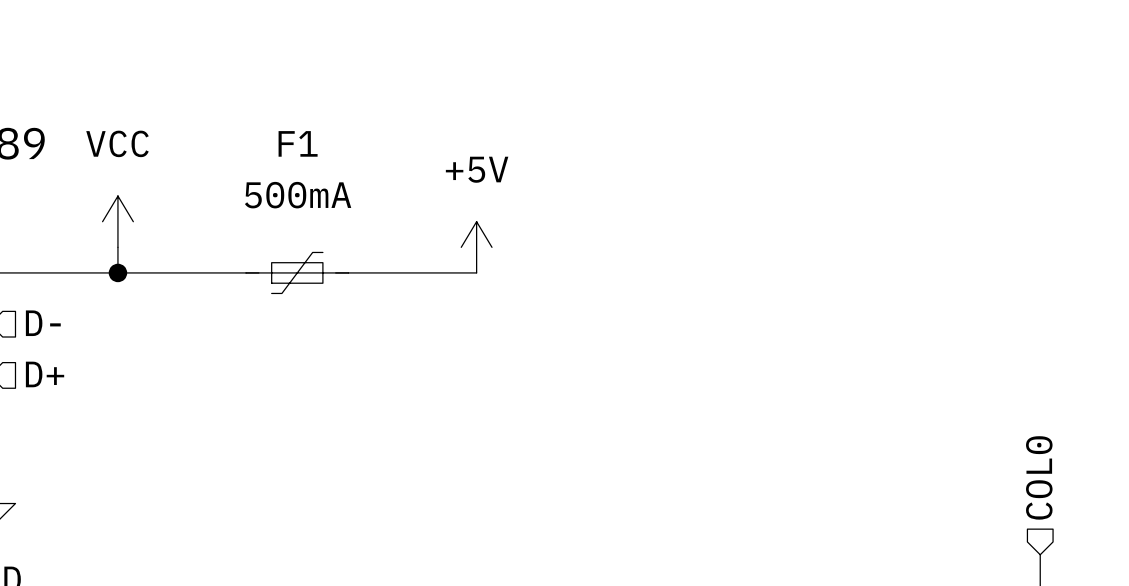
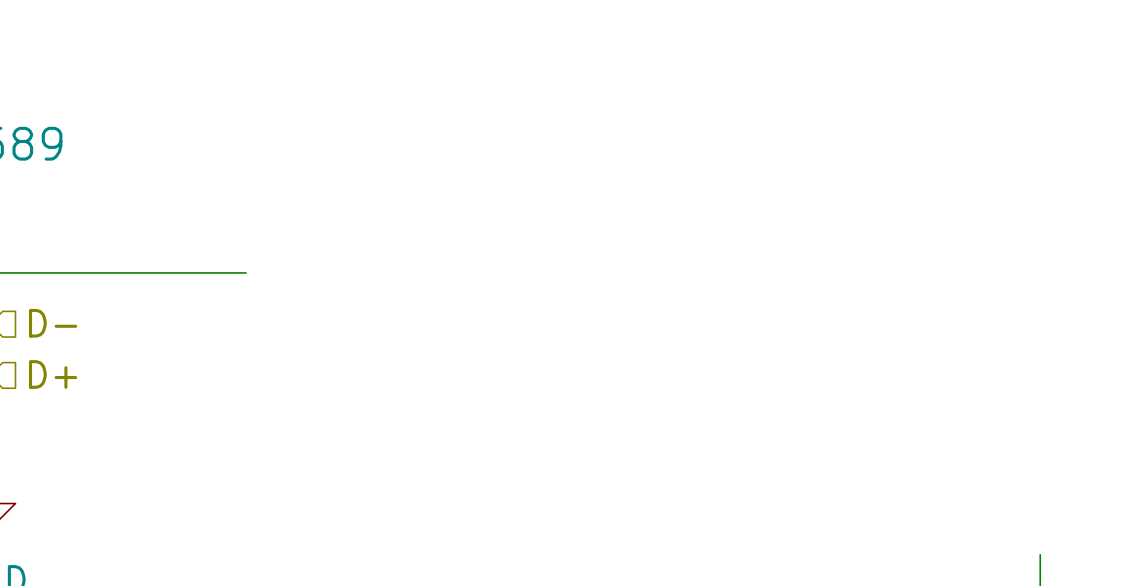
power symbol: VCC (117, 221) -> none
wire: (117, 247) (117, 272) -> none
power symbol: +5V (476, 247) -> none
junction: (117, 272) -> none
F1: 500mA (297, 272) -> none
wire: (348, 272) (476, 272) -> none
hierarchical label: COL0 (1039, 477) -> none

